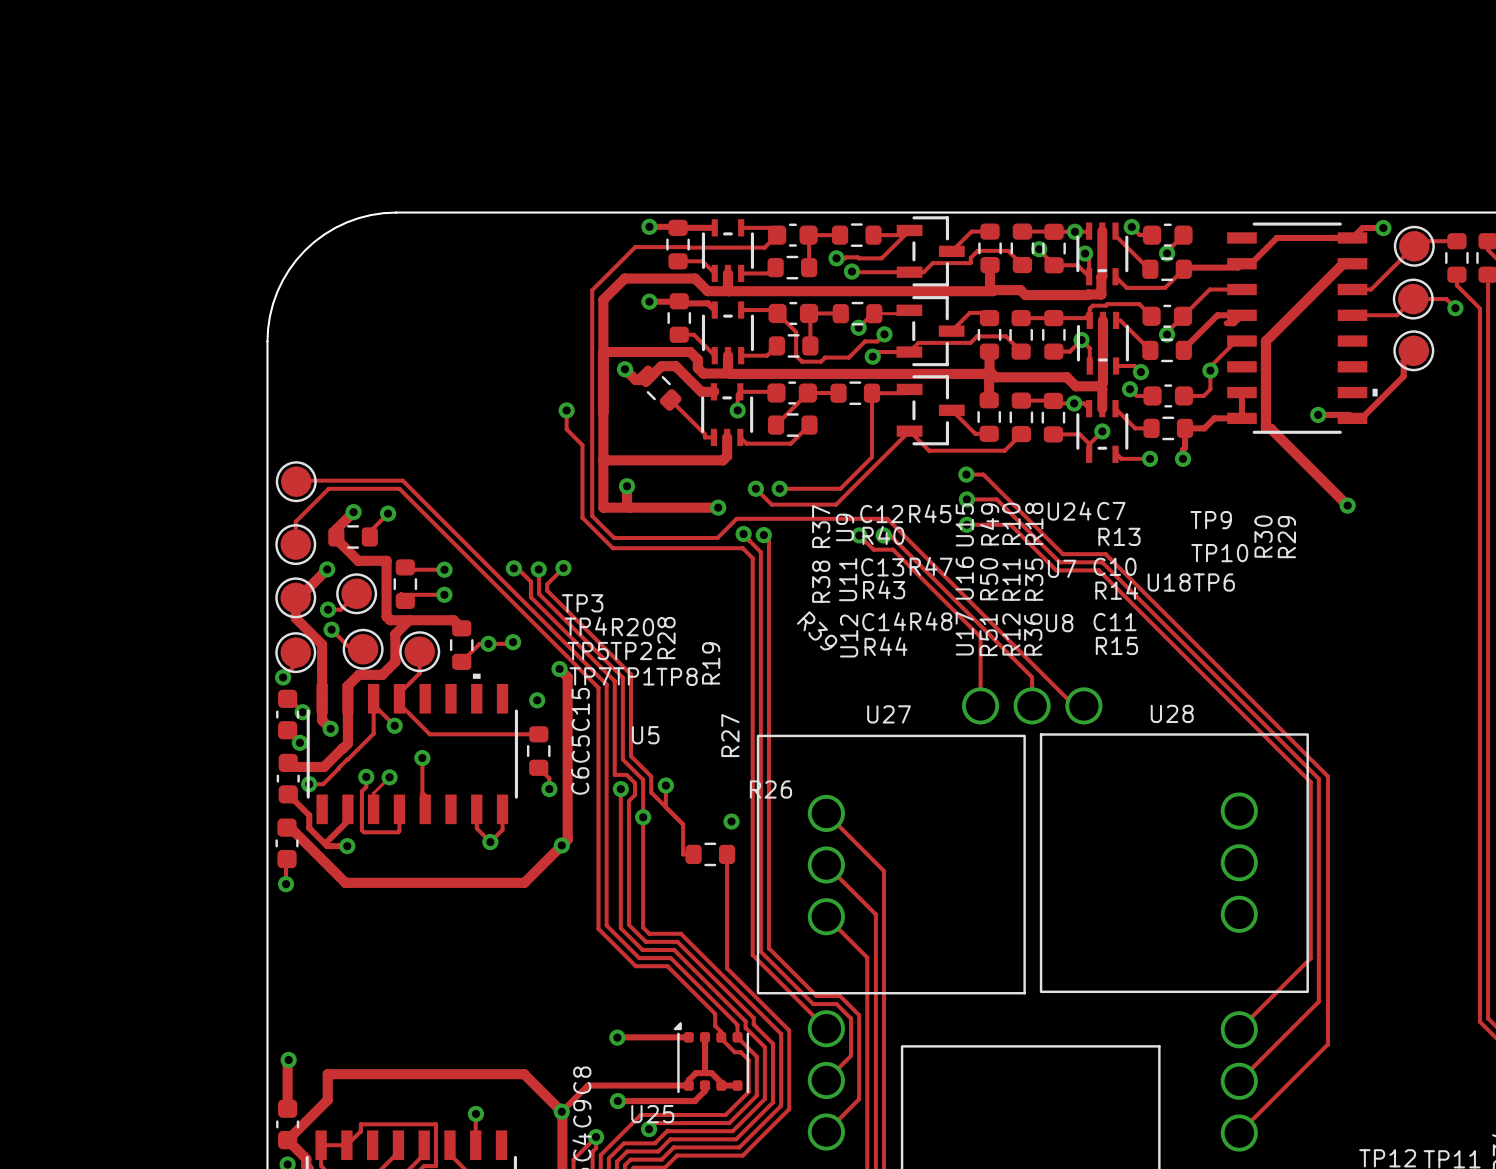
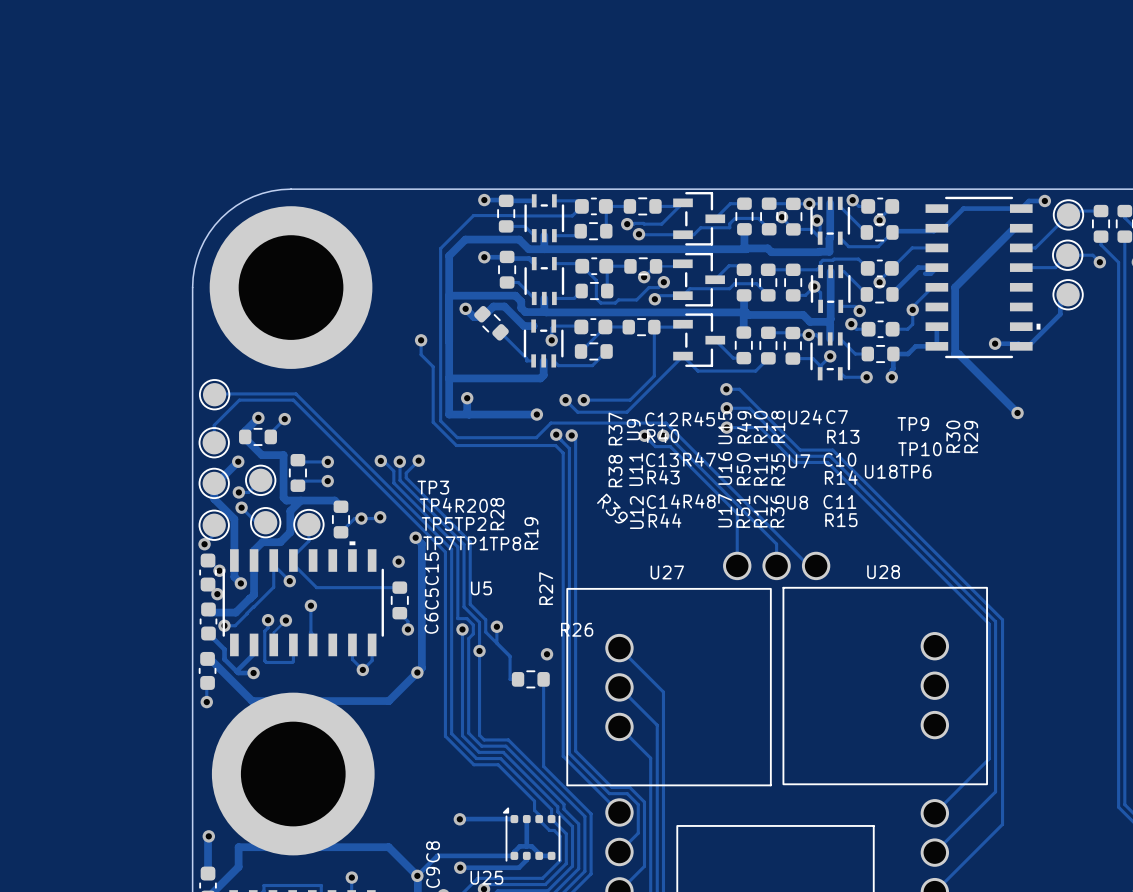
part: none -> (291, 287)
part: none -> (293, 774)

